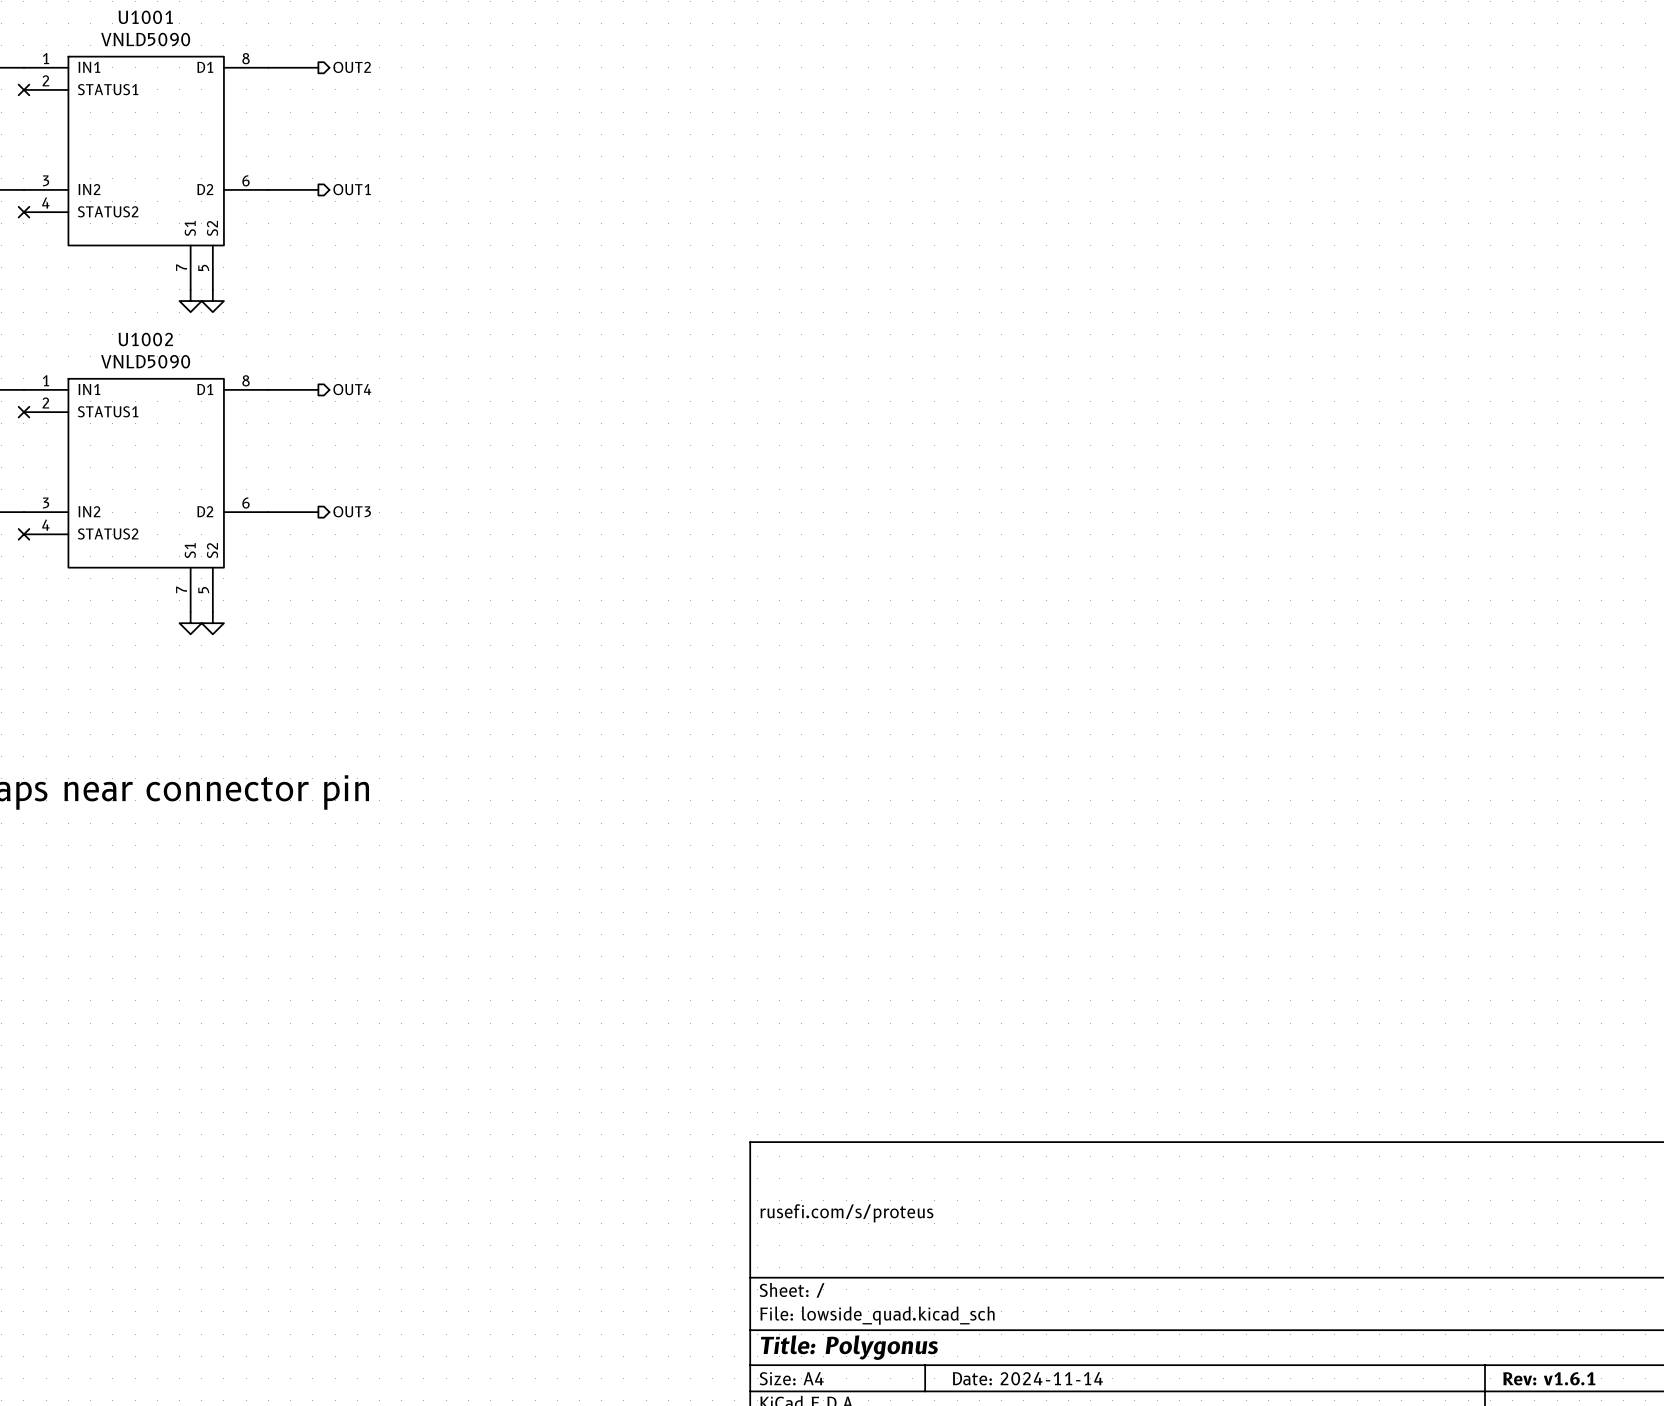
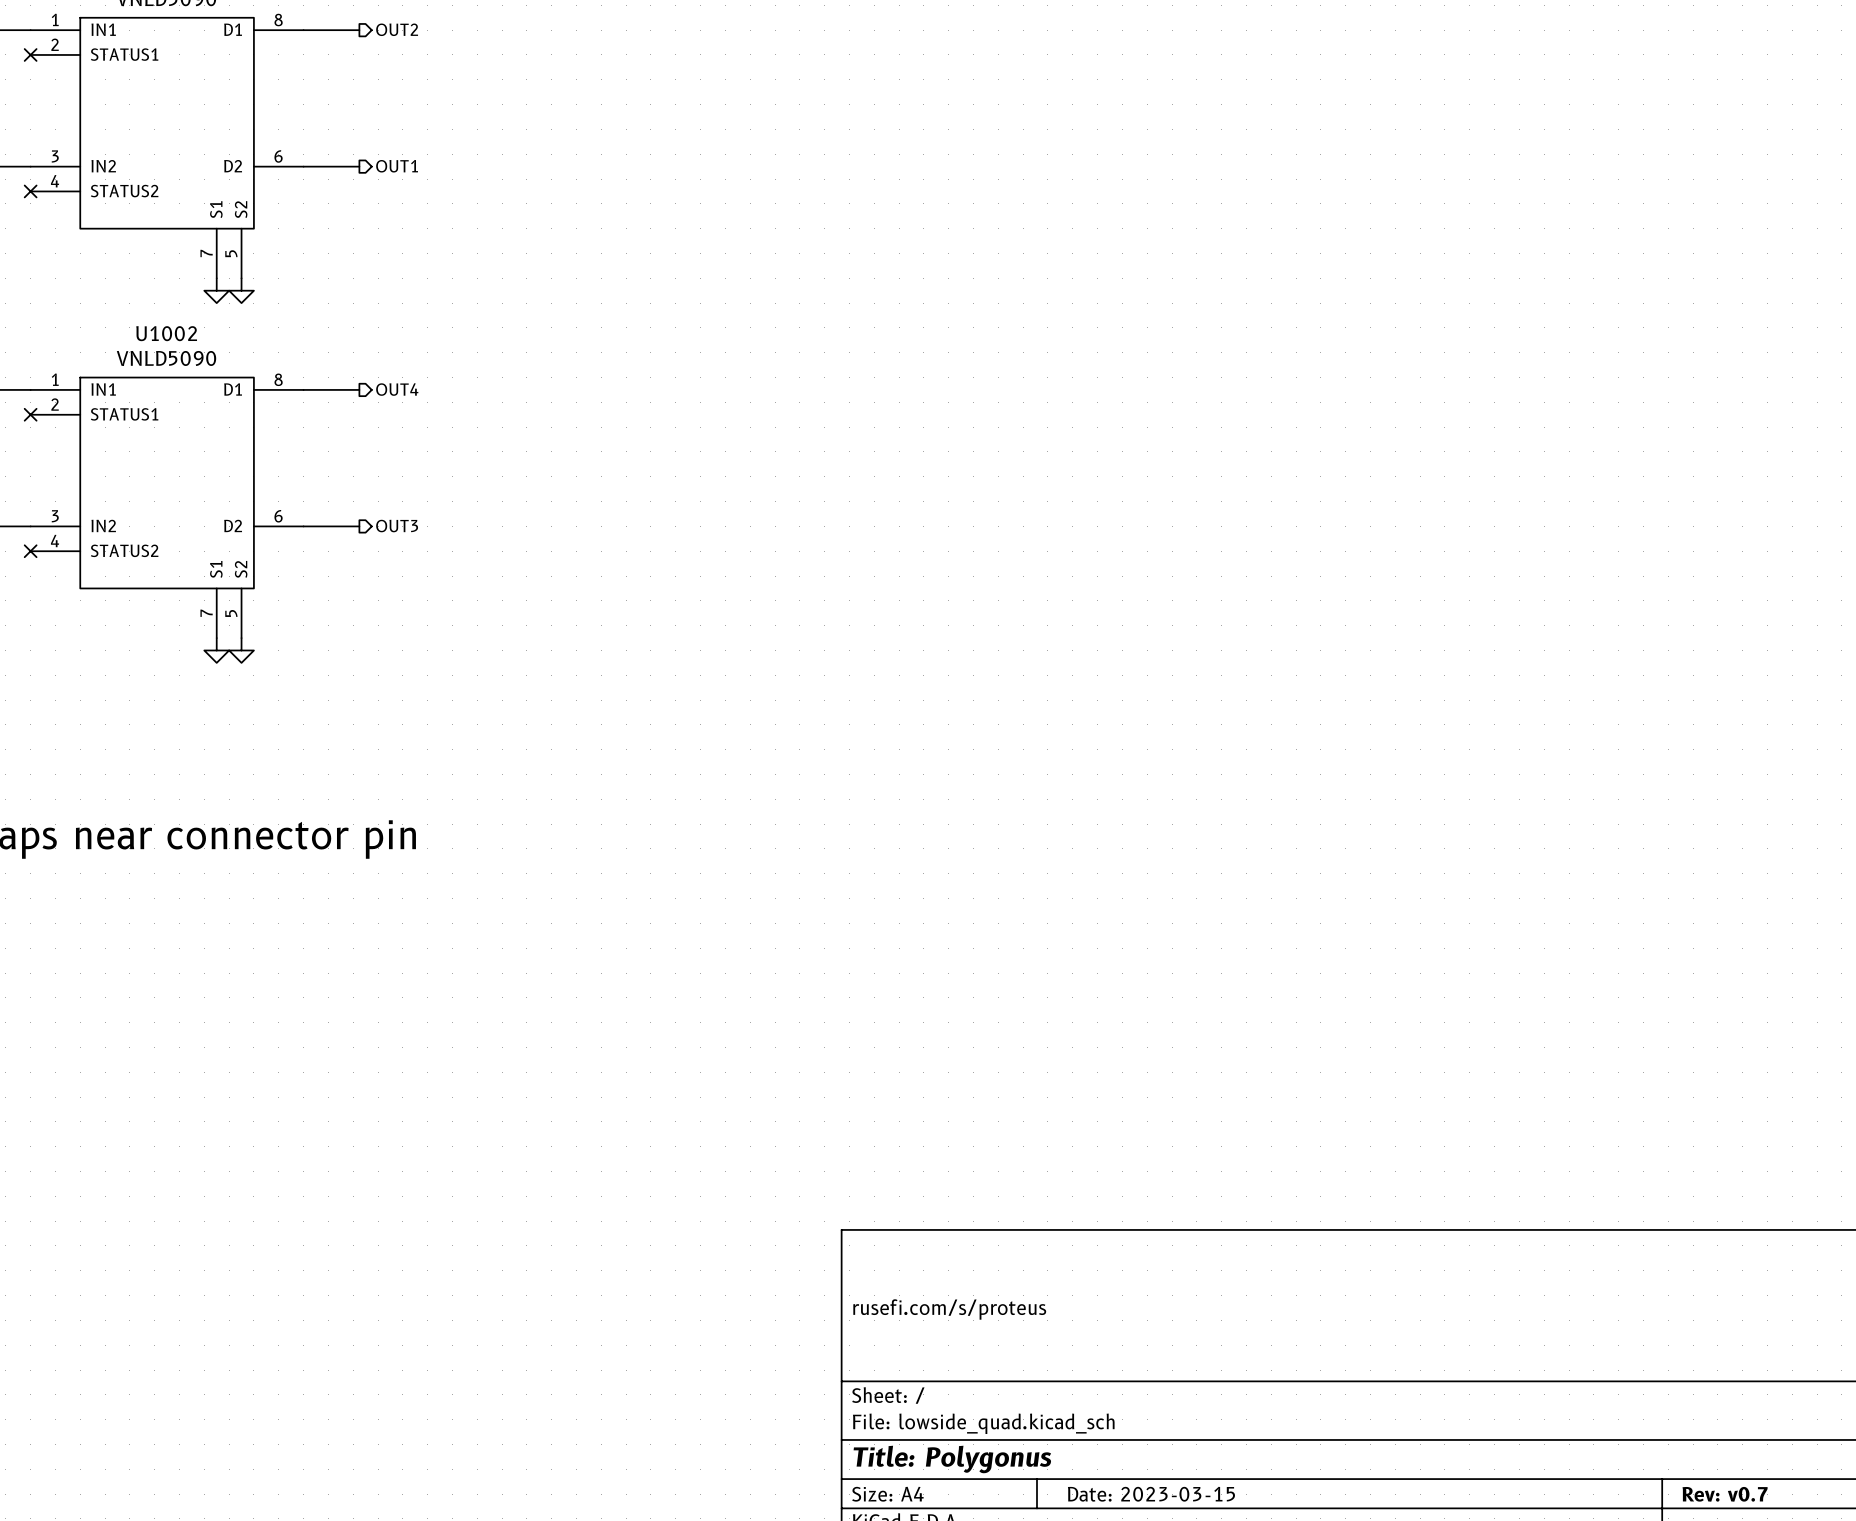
title block: Date: 2024-11-14 (1027, 1378) -> Date: 2023-03-15 (1151, 1494)
title block: Rev: v1.6.1 (1549, 1378) -> Rev: v0.7 (1725, 1494)

